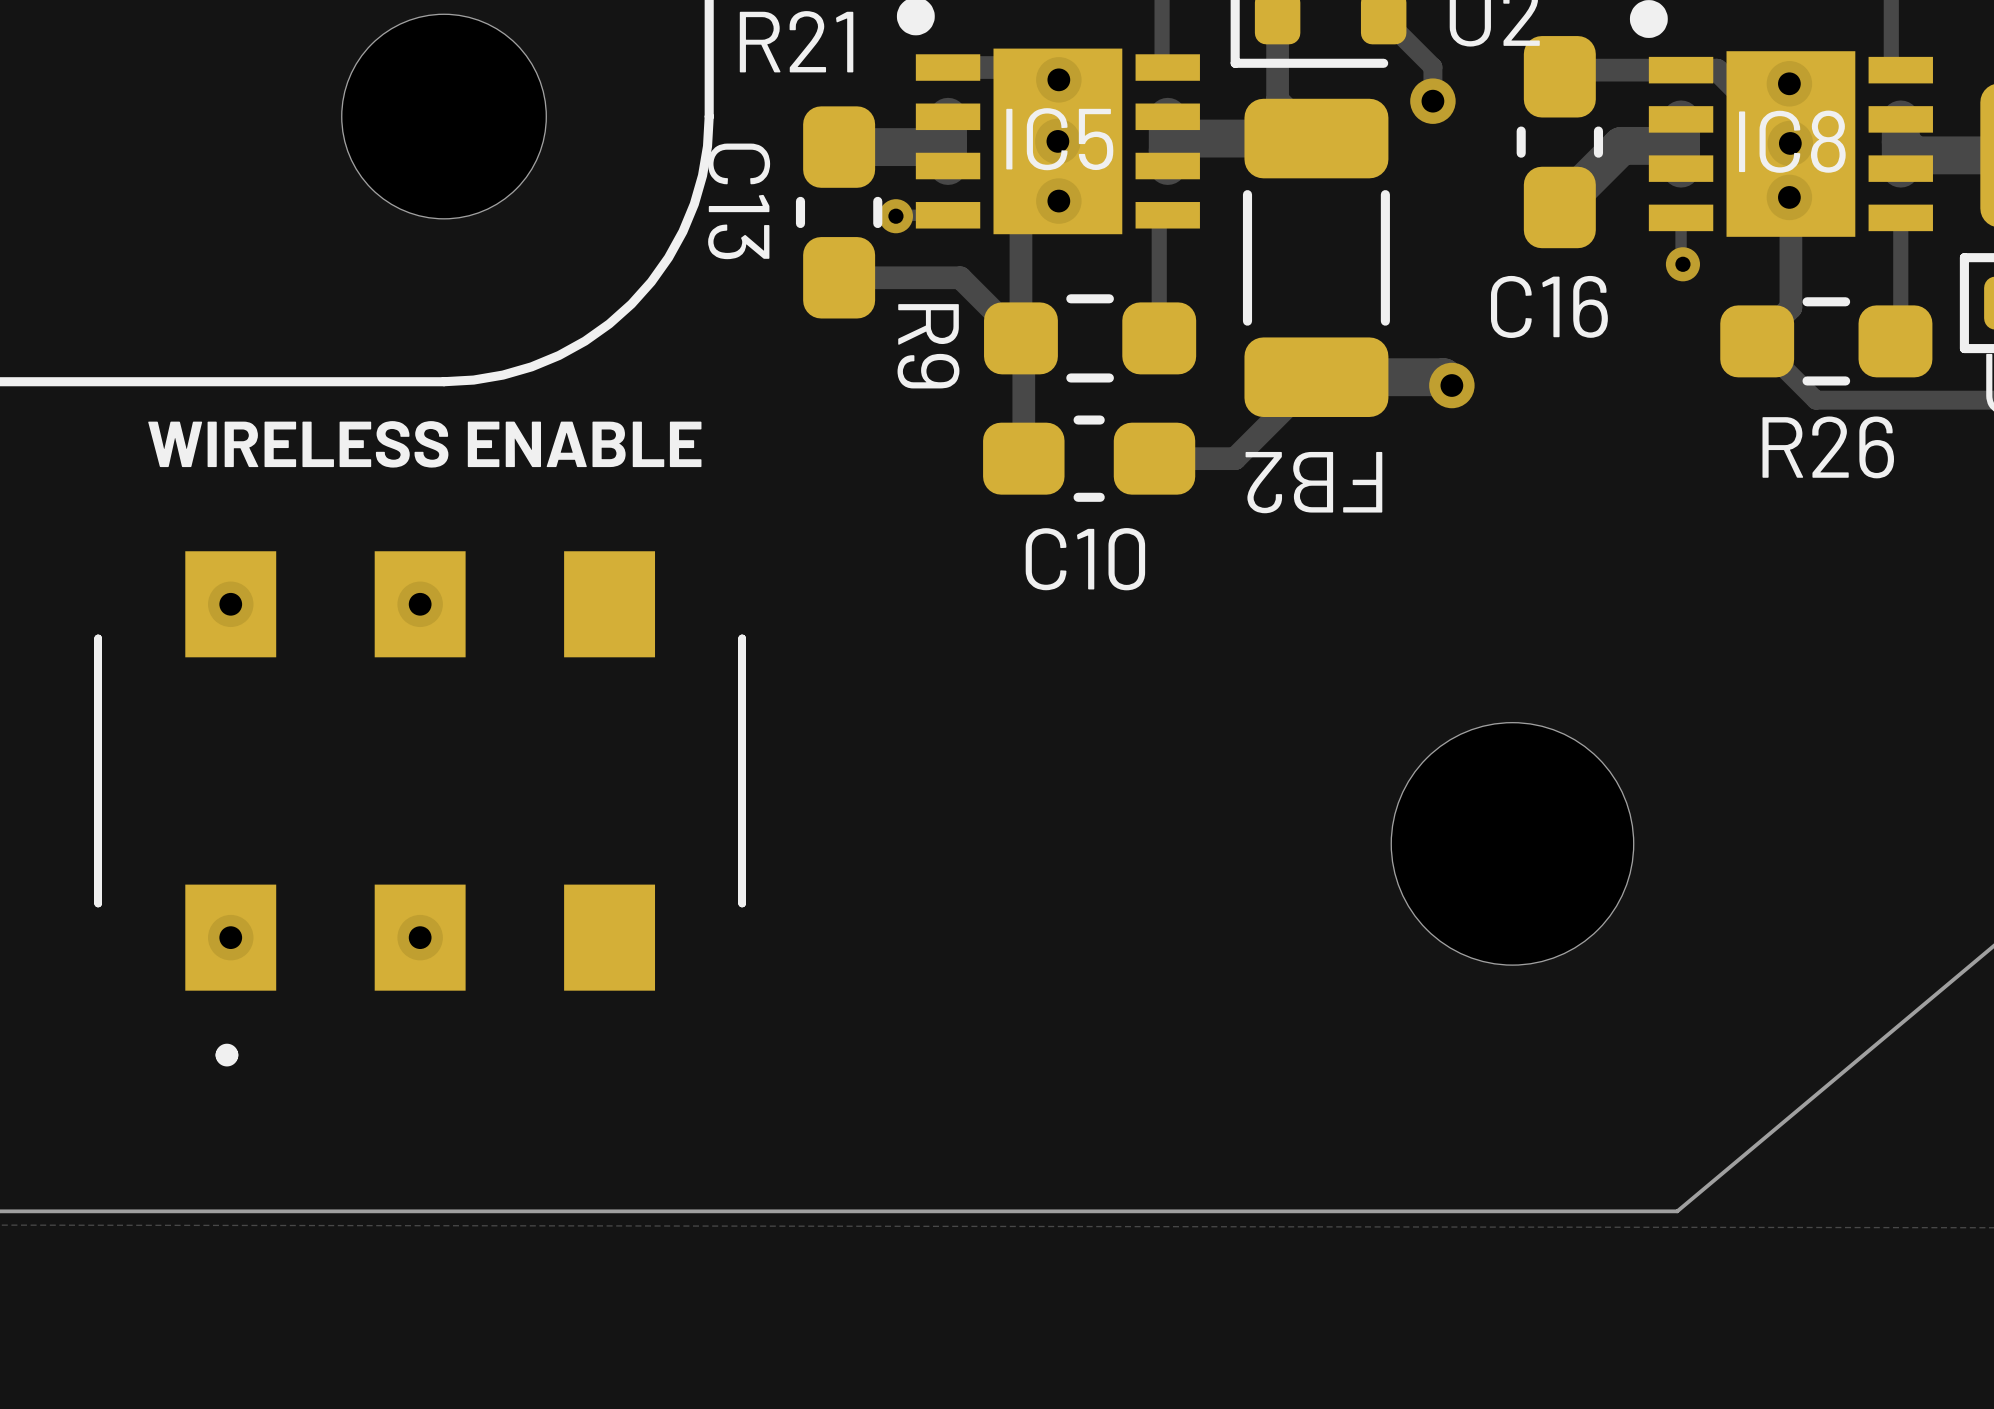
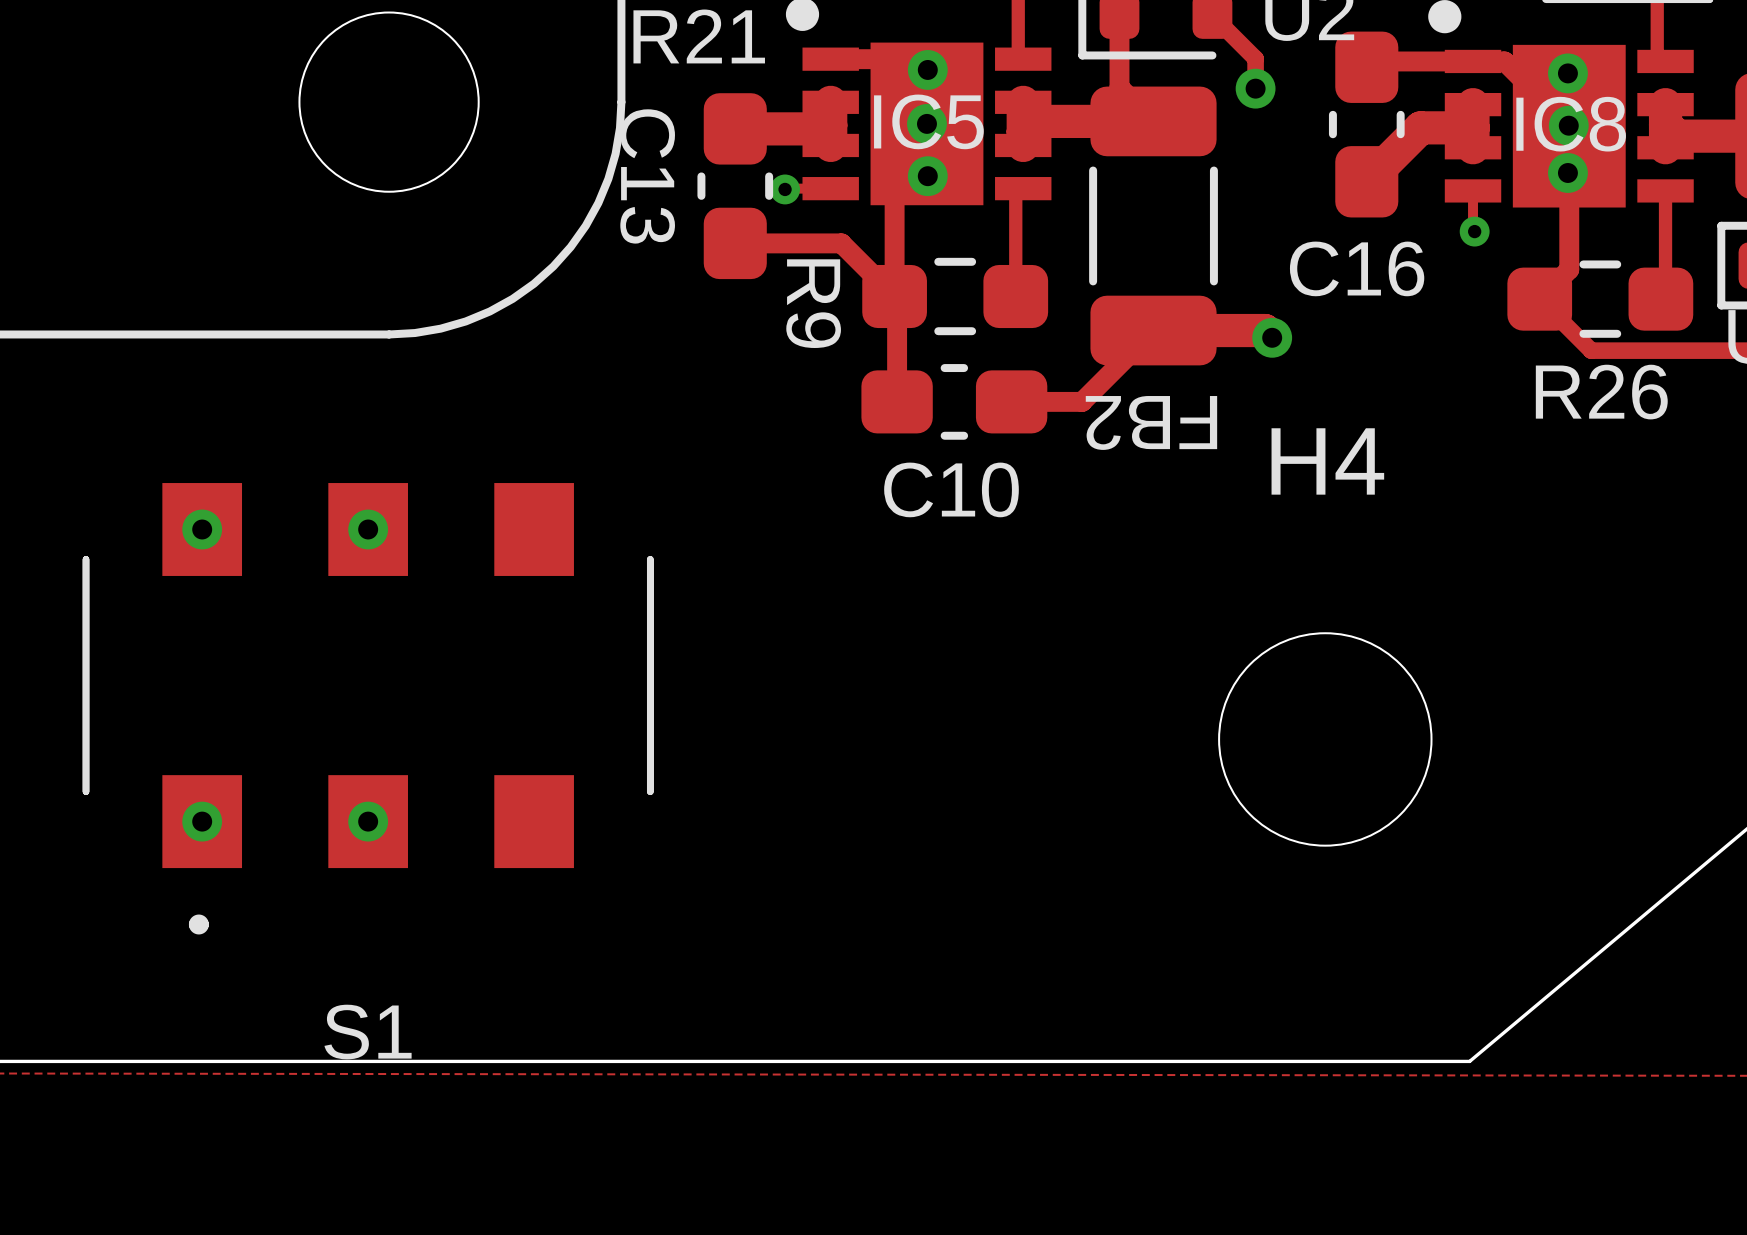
text: WIRELESS ENABLE (424, 444) -> none
H4 name: none -> H4 (1327, 461)
S1 name: none -> S1 (368, 1032)

